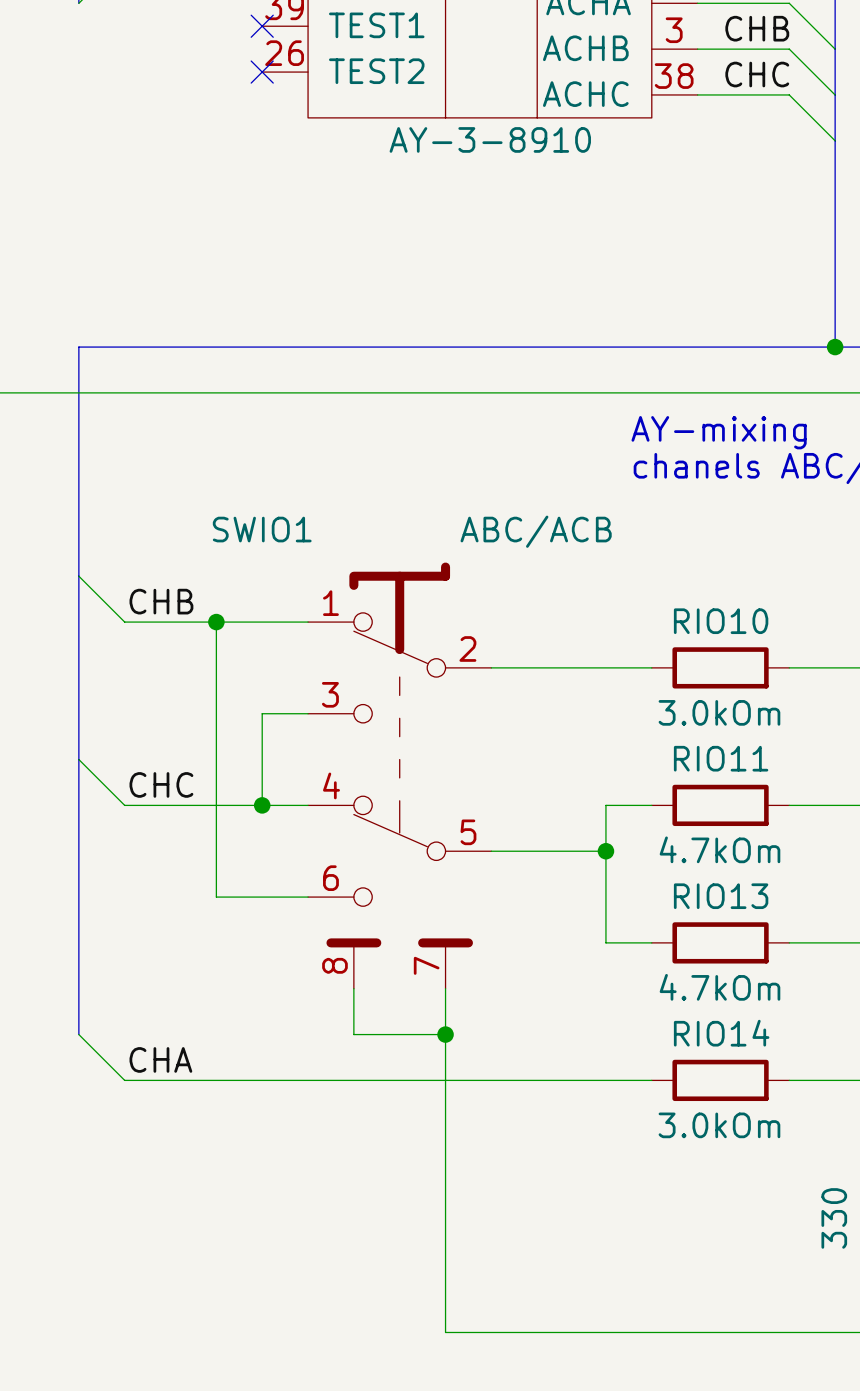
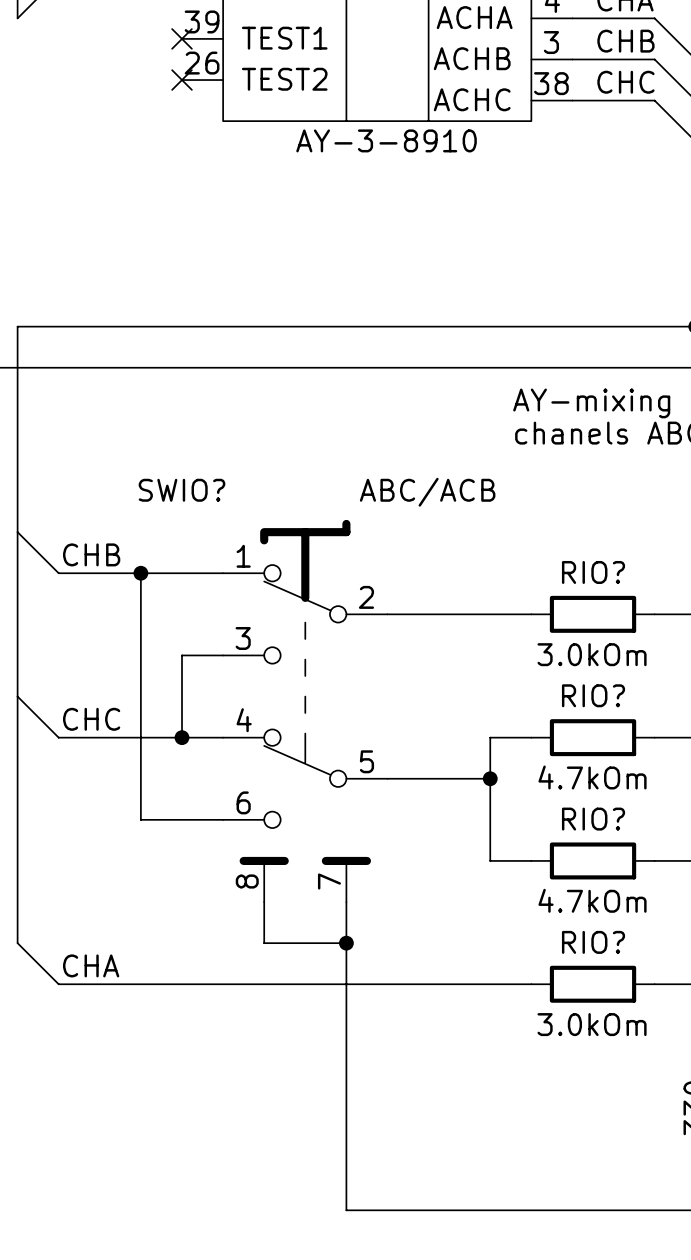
SWIO1 name: SWIO1 (262, 529) -> SWIO? (182, 490)
RIO10 name: RIO10 (721, 621) -> RIO? (593, 572)
RIO11 name: RIO11 (721, 758) -> RIO? (593, 695)
RIO13 name: RIO13 (721, 896) -> RIO? (593, 819)
RIO14 name: RIO14 (721, 1033) -> RIO? (593, 942)

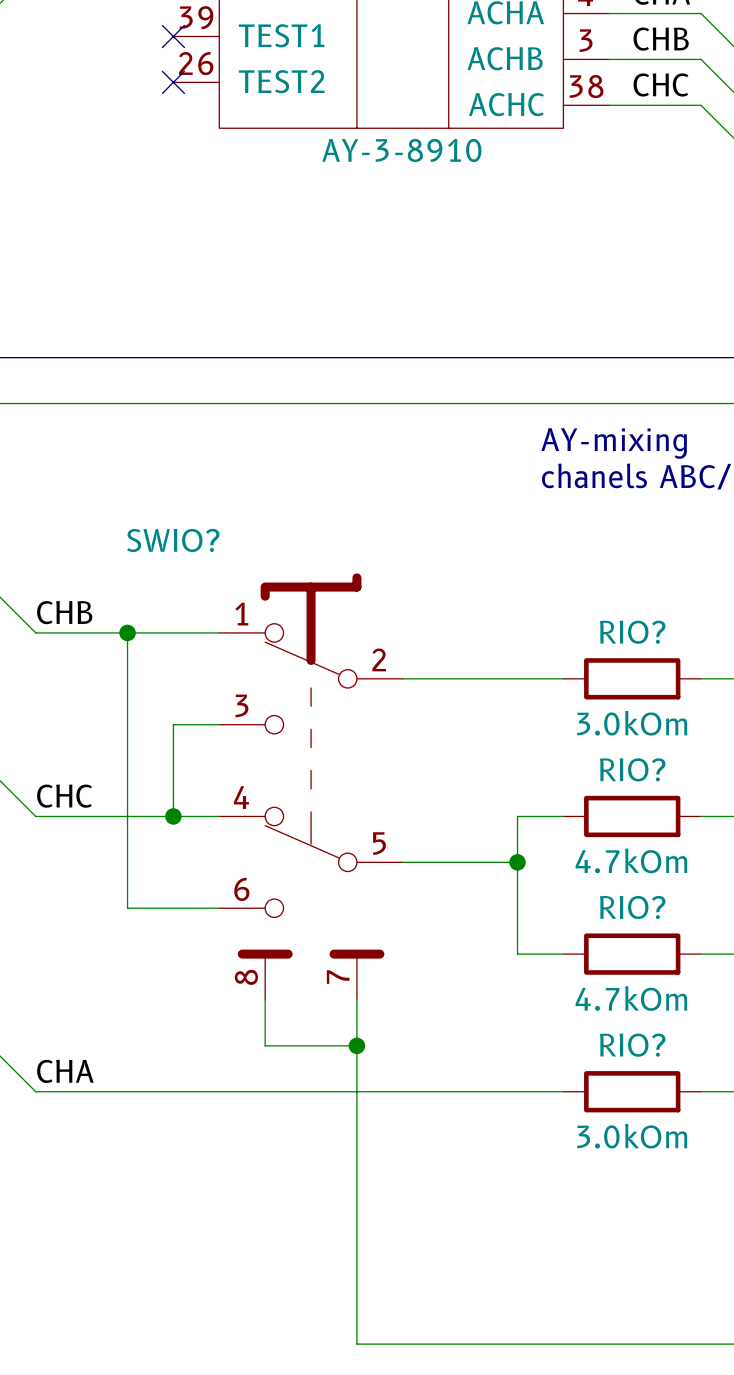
SWIO? value: ABC/ACB (427, 492) -> none

